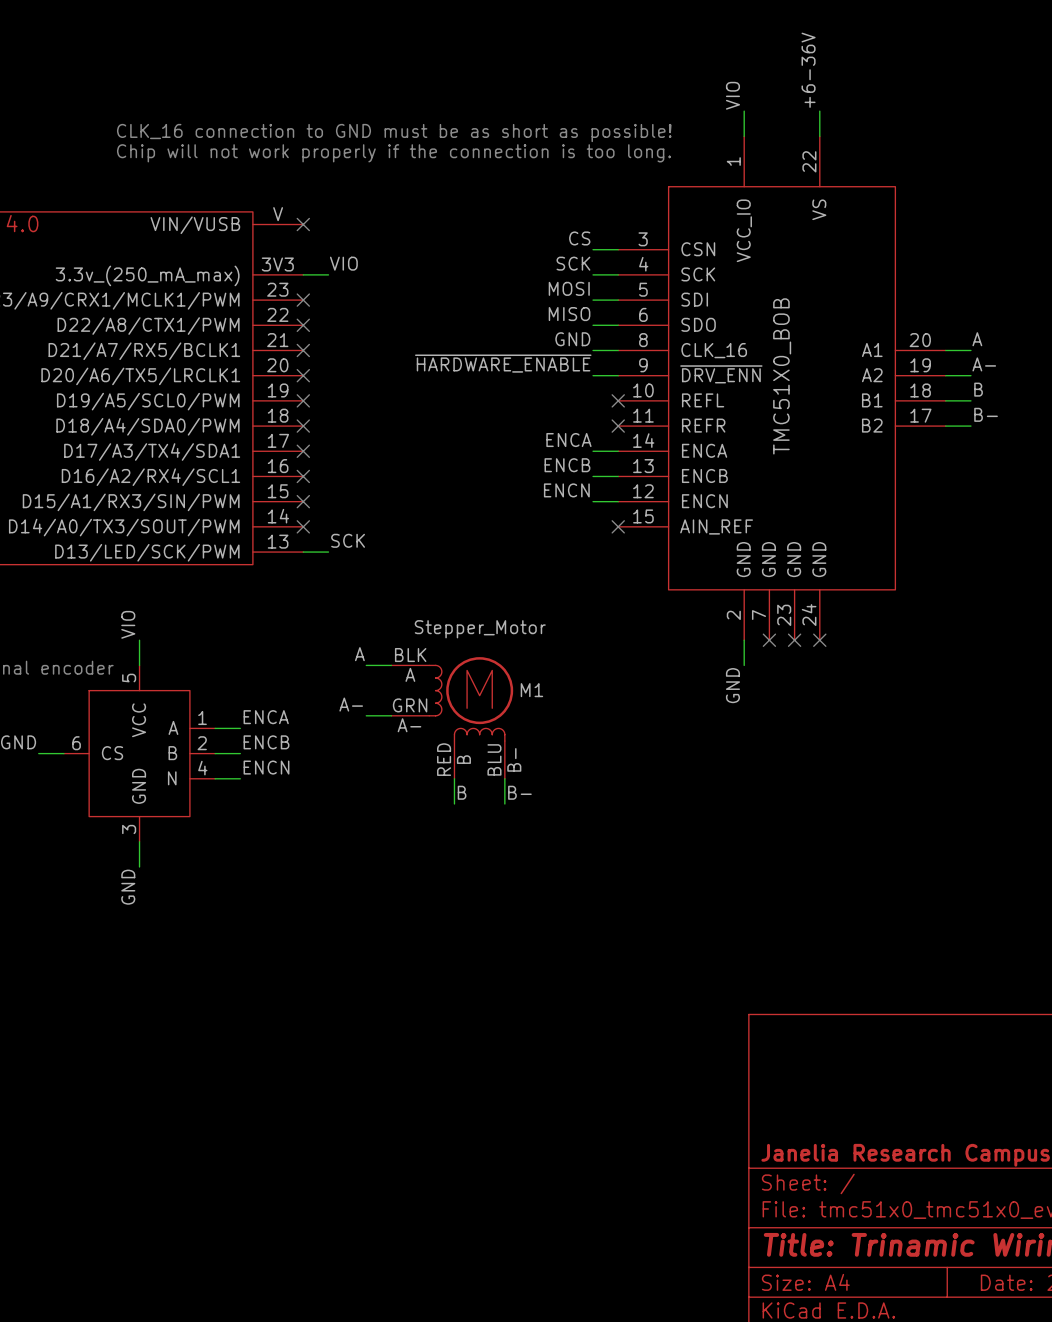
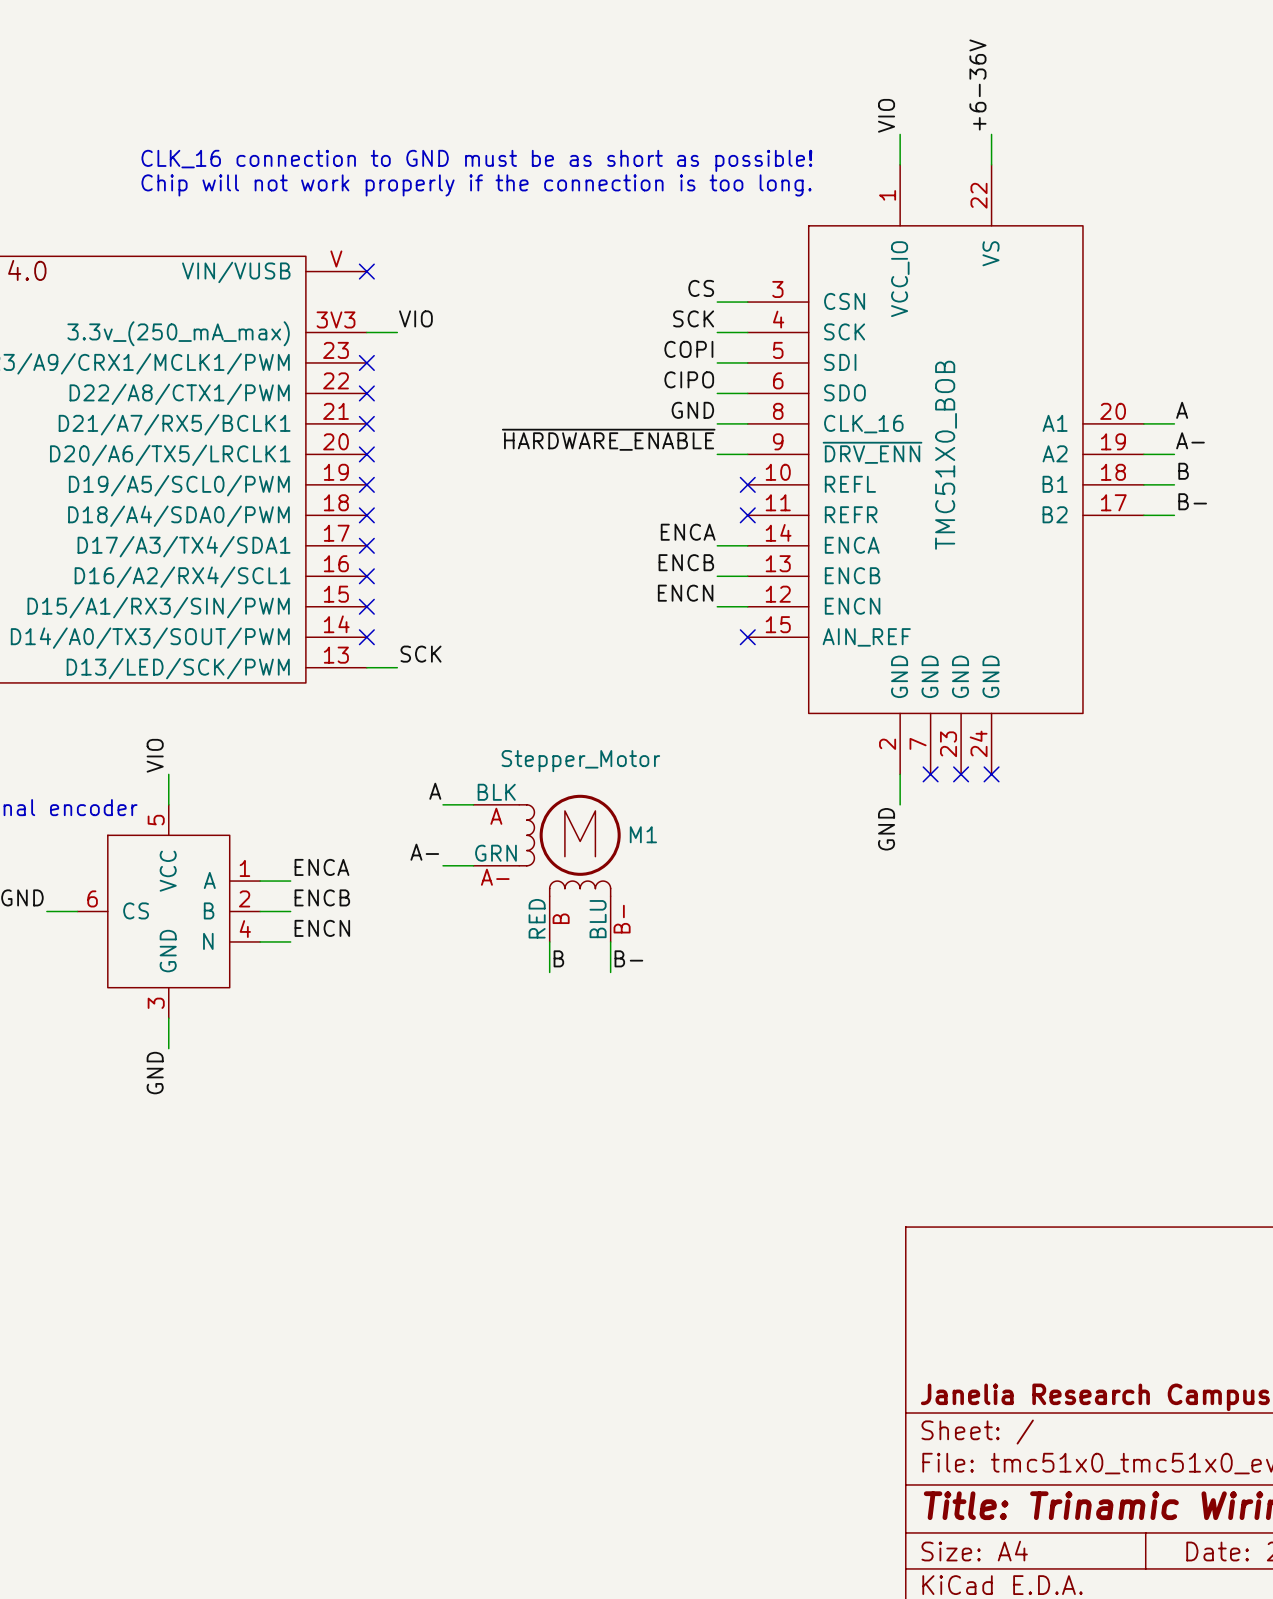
label: MOSI (569, 288) -> COPI (688, 349)
label: MISO (569, 314) -> CIPO (689, 379)

